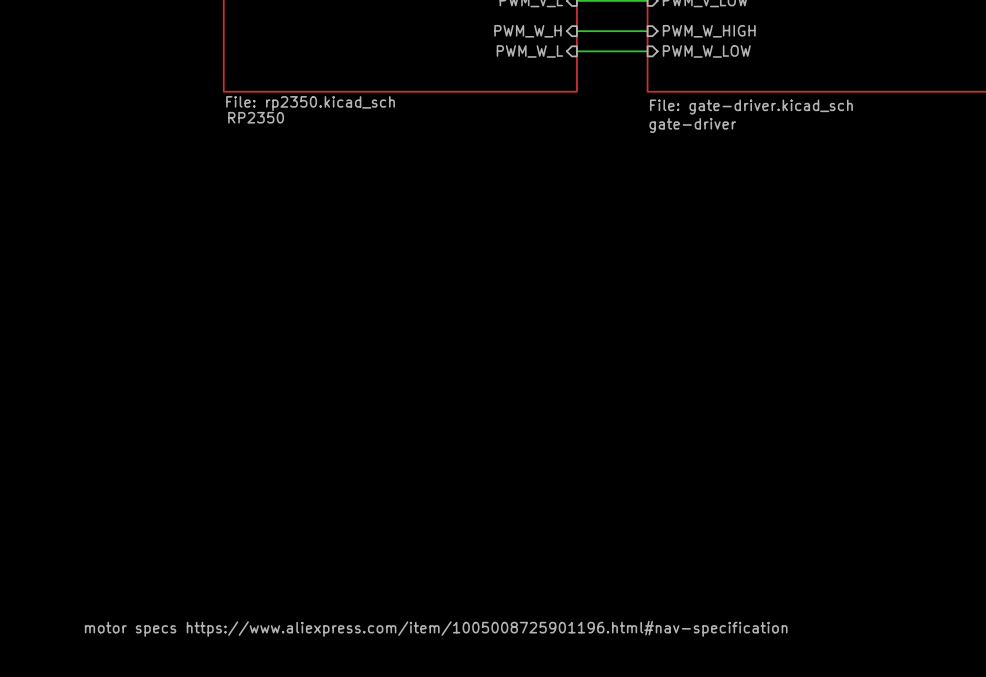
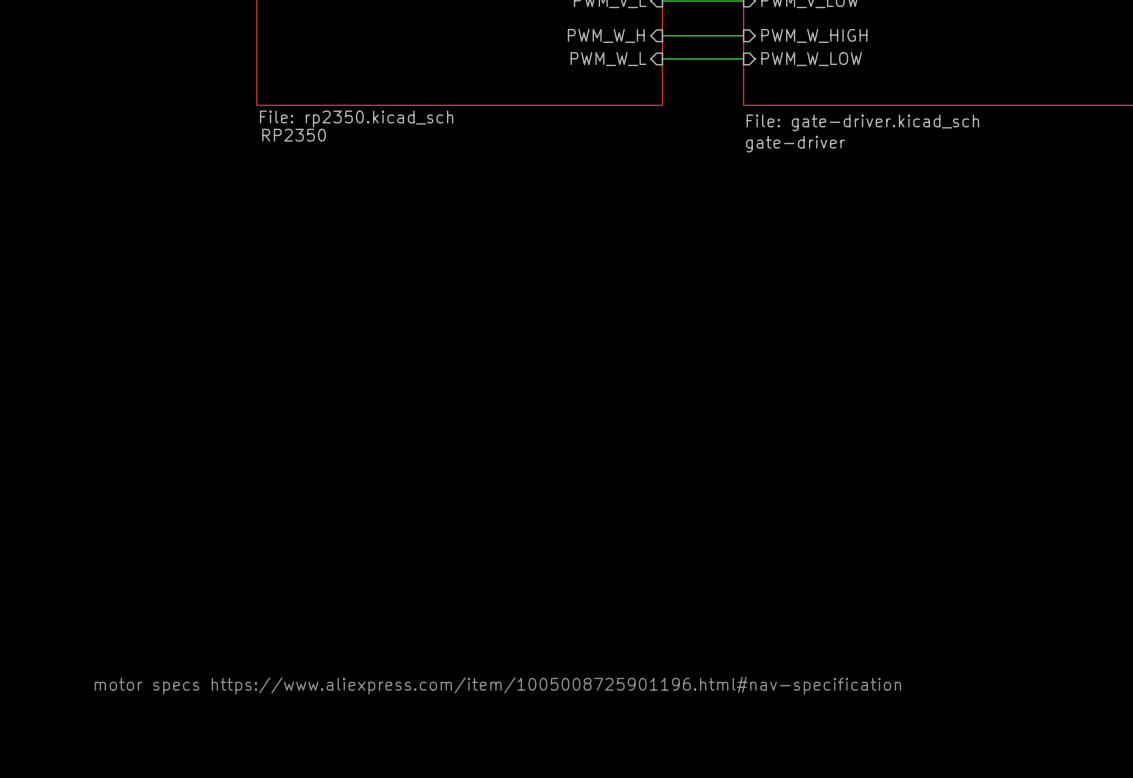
text: none -> motor specs https://www.aliexpress.com/item/1005008725901196.html#nav-specification (497, 685)
label: motor specs https://www.aliexpress.com/item/1005008725901196.html#nav-specification (436, 628) -> none

